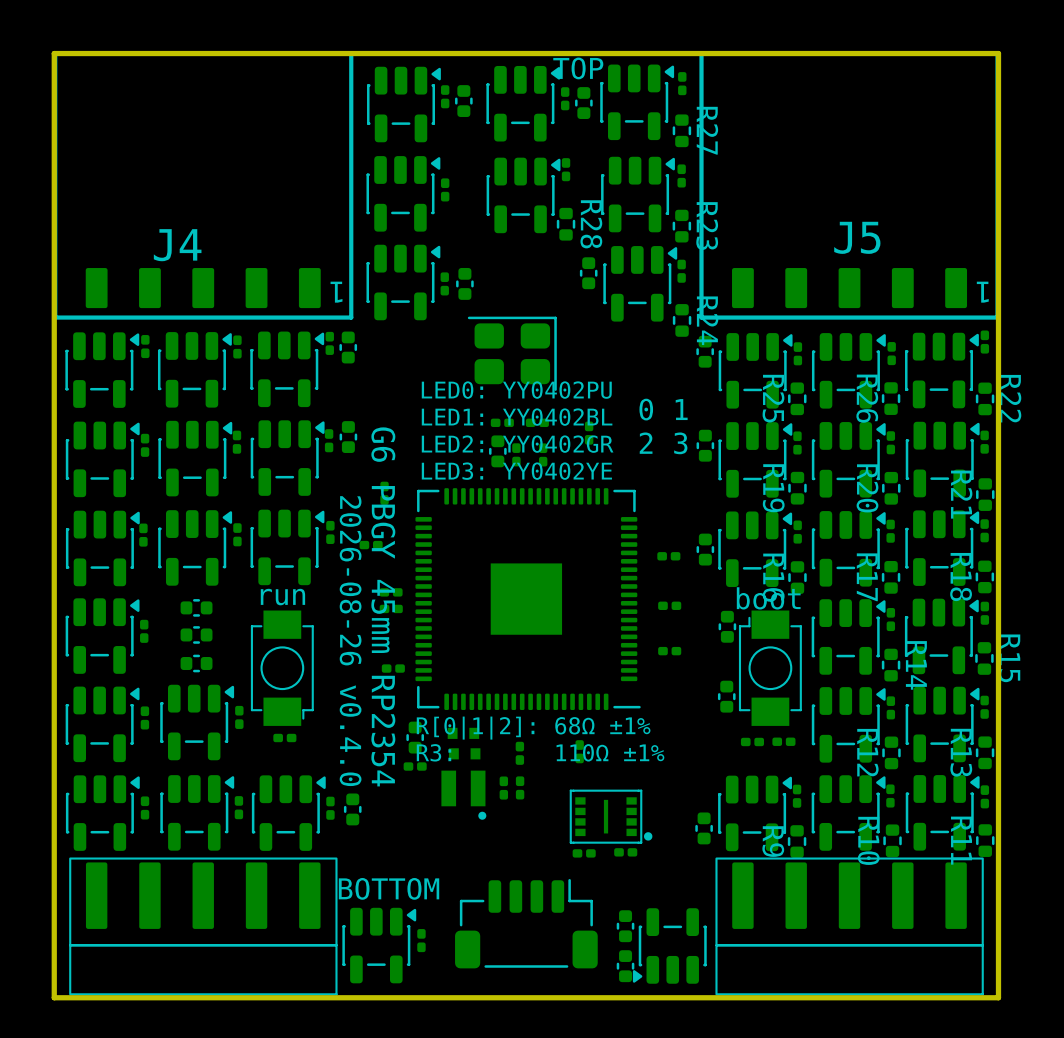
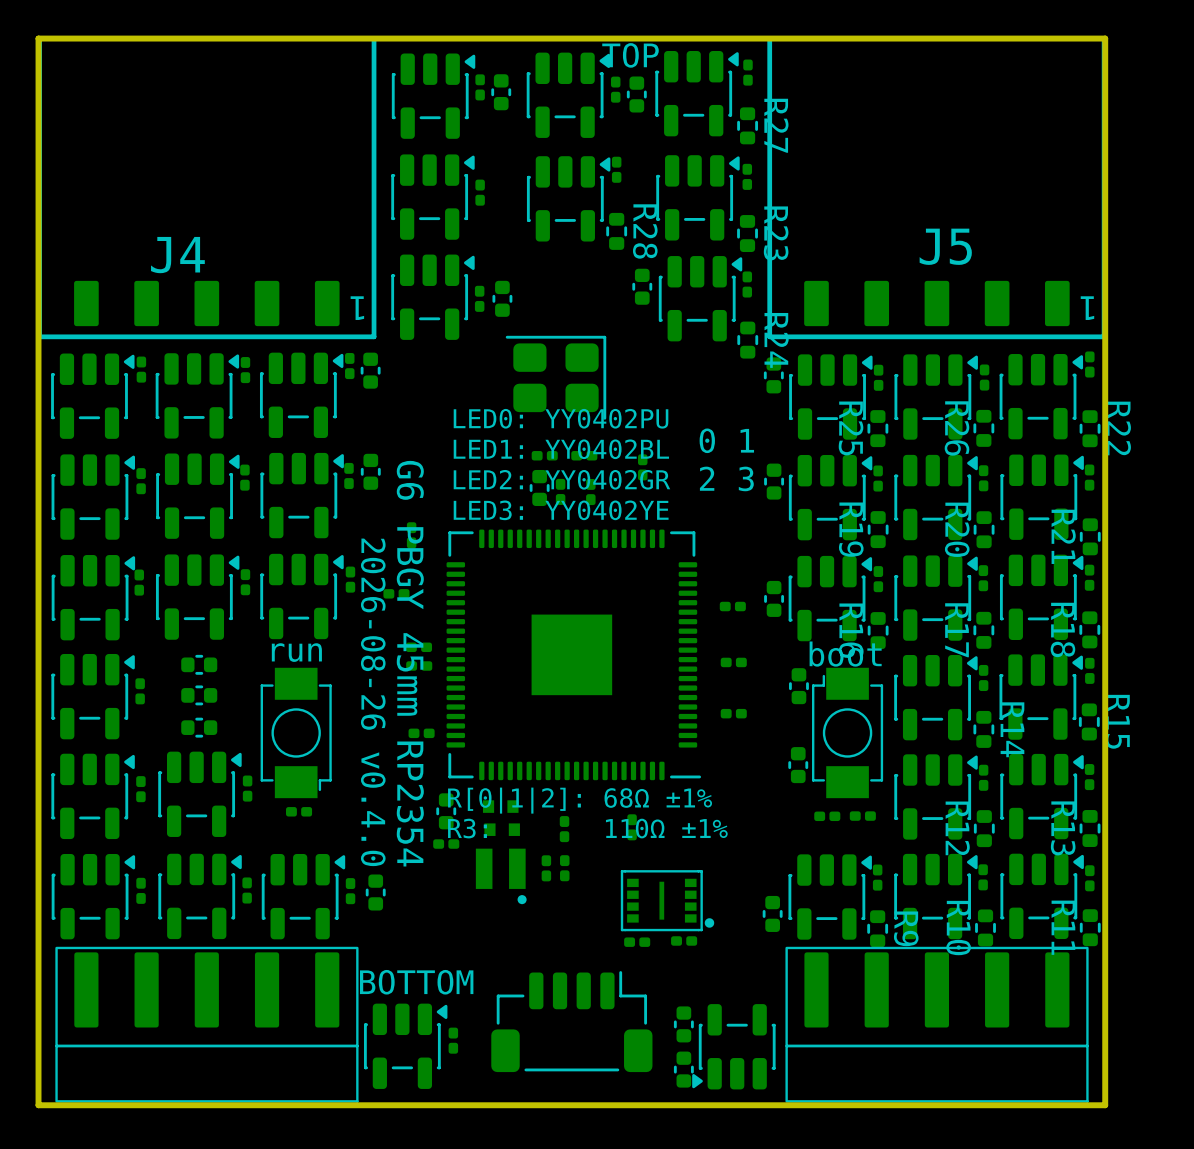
R9 name position: R9 (773, 841) -> R9 (906, 928)

